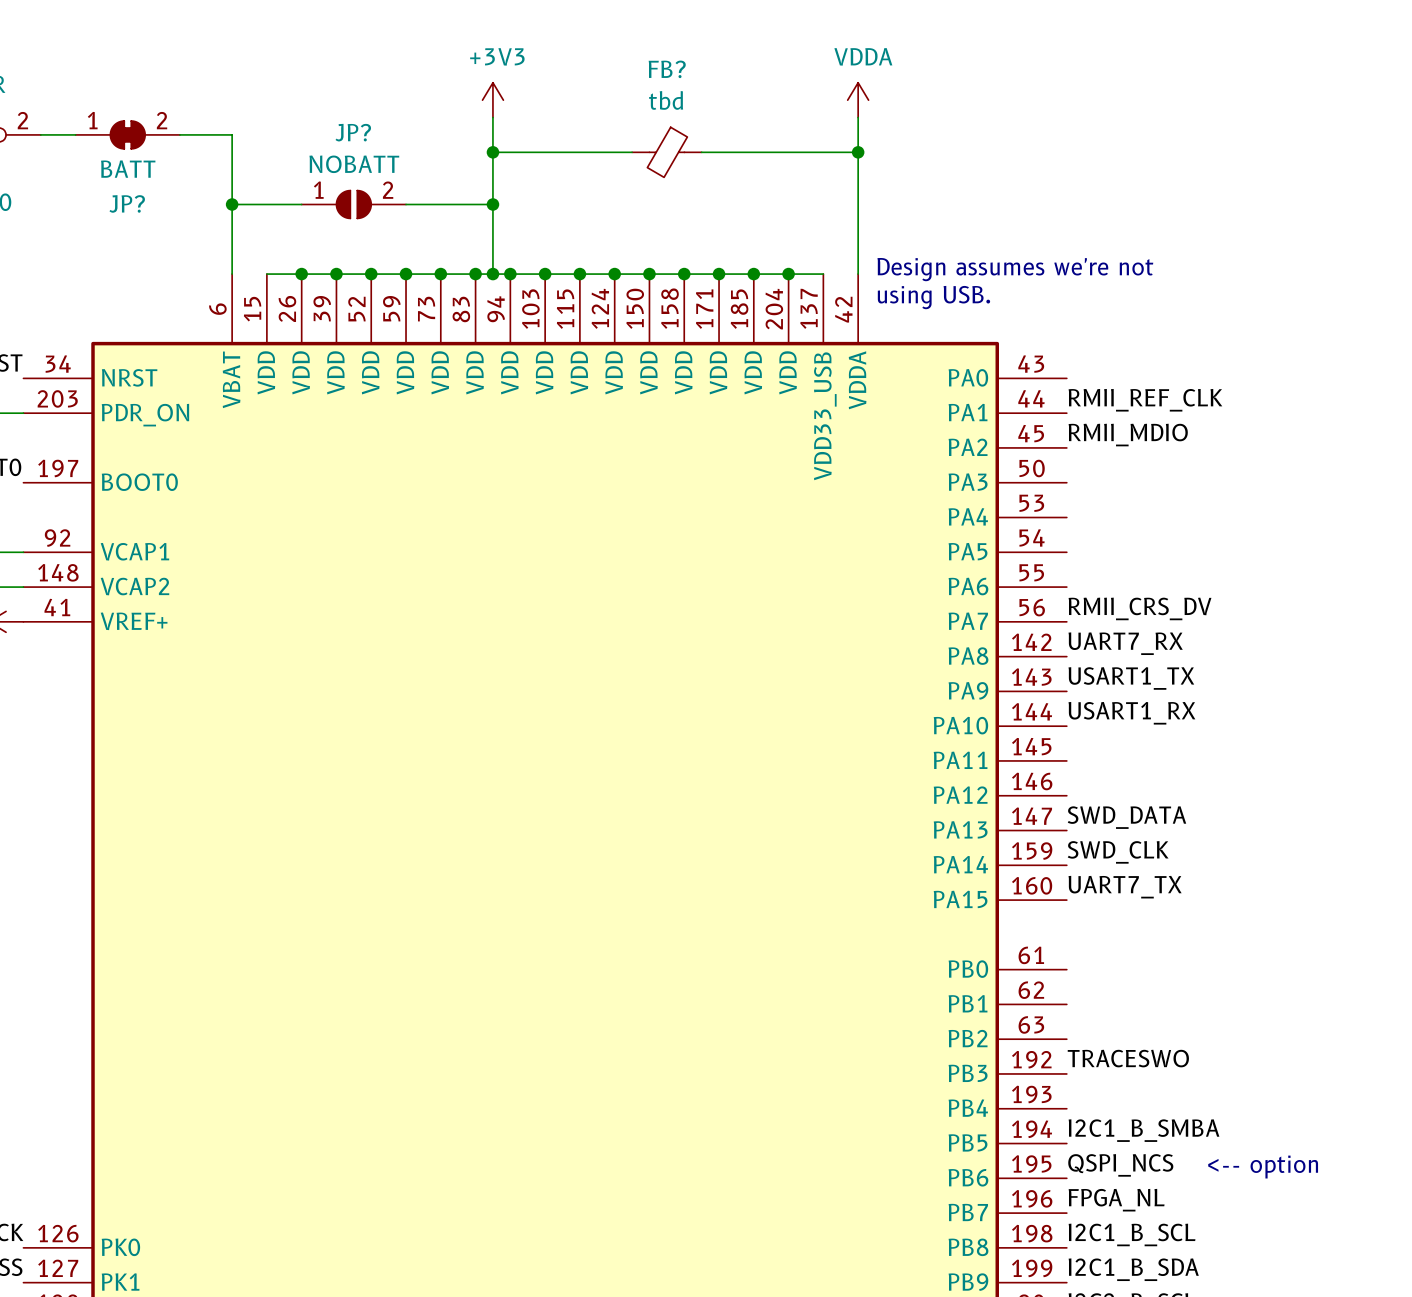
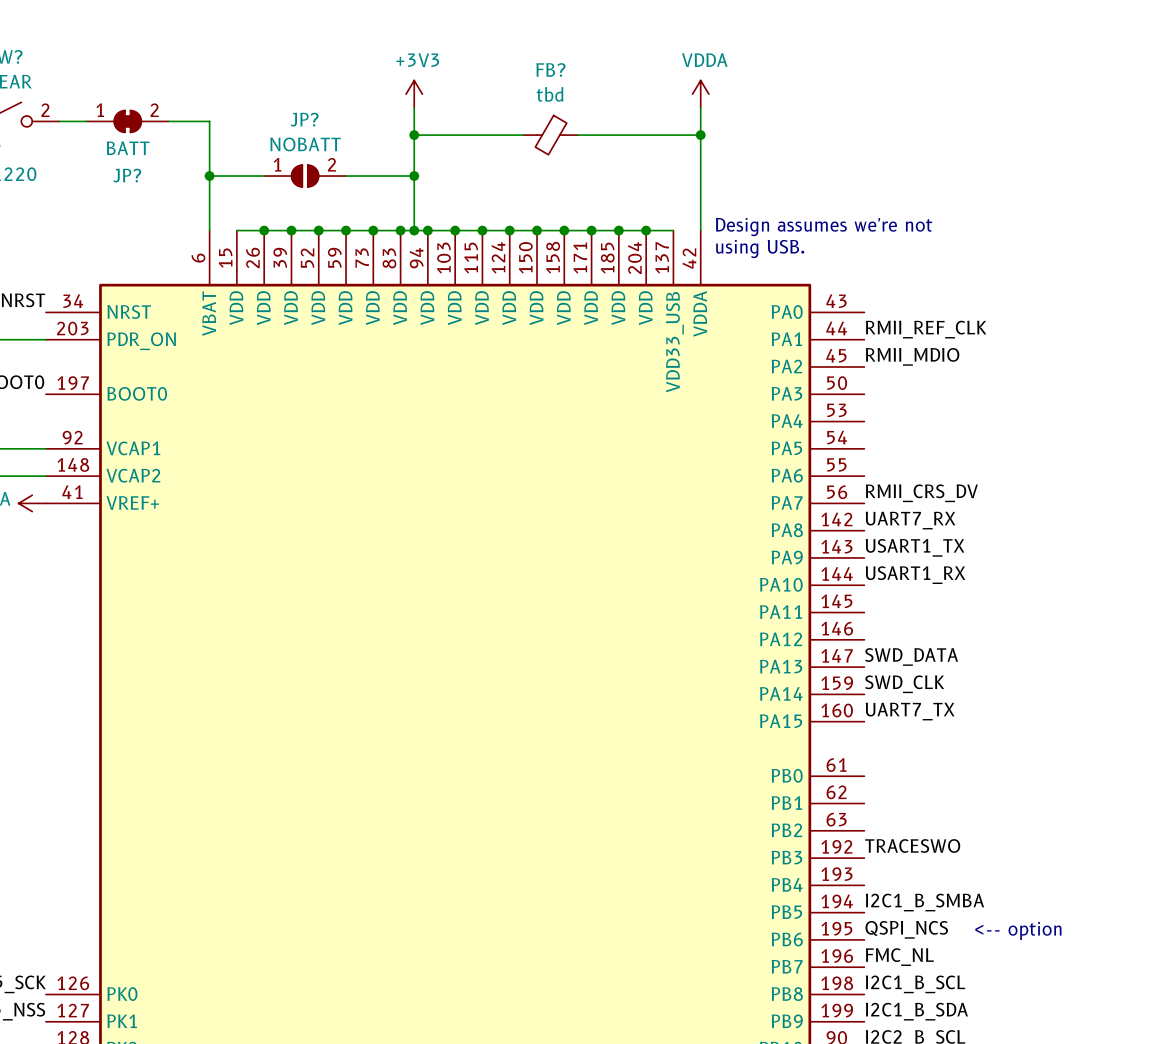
label: FPGA_NL (1116, 1200) -> FMC_NL (899, 957)

